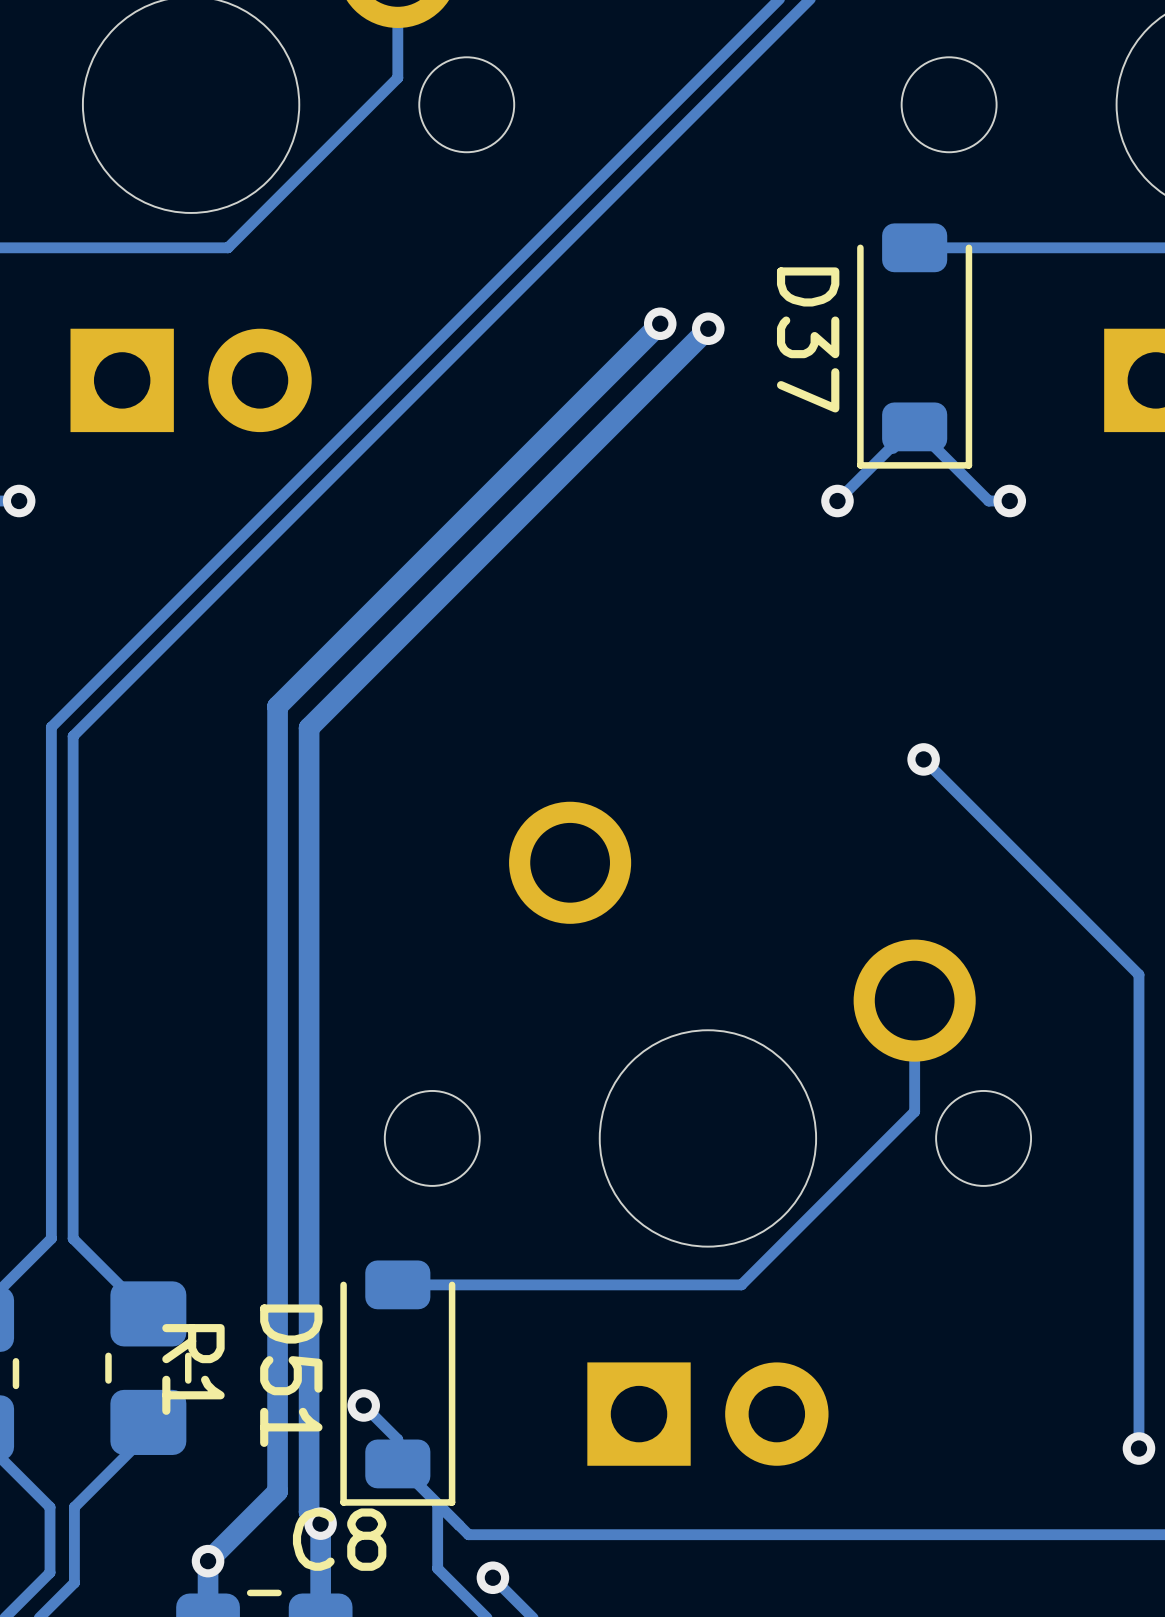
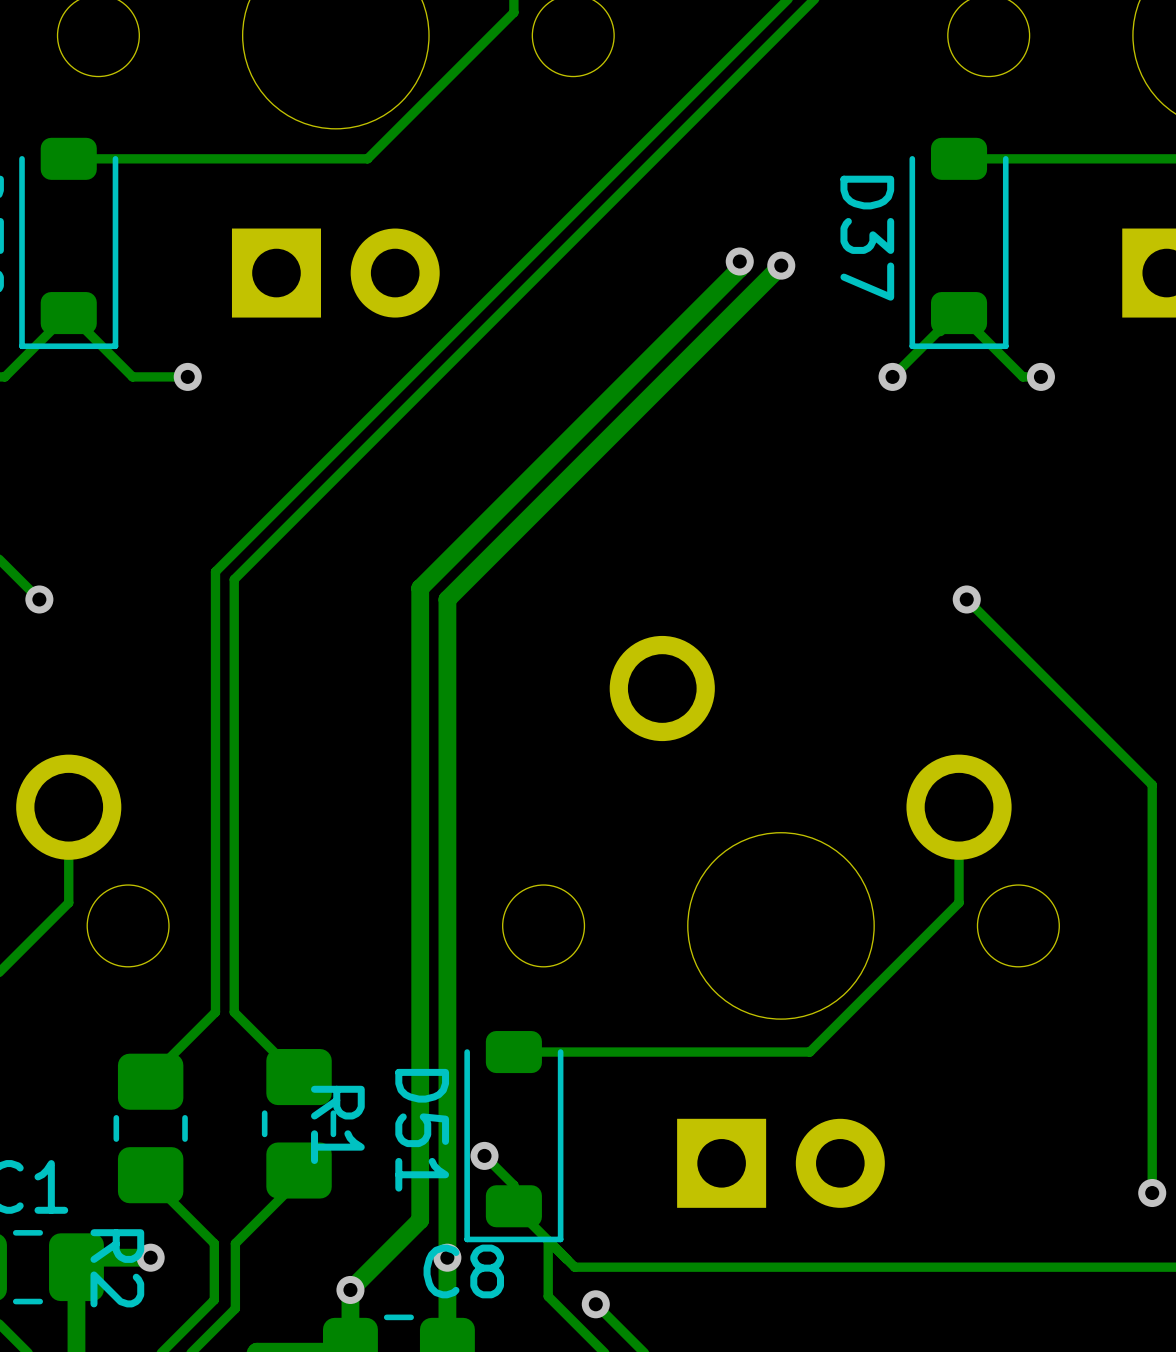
track: (660, 323) (277, 706) (277, 1491) -> (739, 261) (739, 268) (420, 588) (420, 1220) (410, 1230)
via: (660, 323) -> none
track: (708, 328) (309, 727) (309, 1512) (320, 1523) -> (781, 265) (447, 599) (447, 1257)
via: (708, 328) -> none
via: none -> (739, 261)
via: none -> (781, 265)

